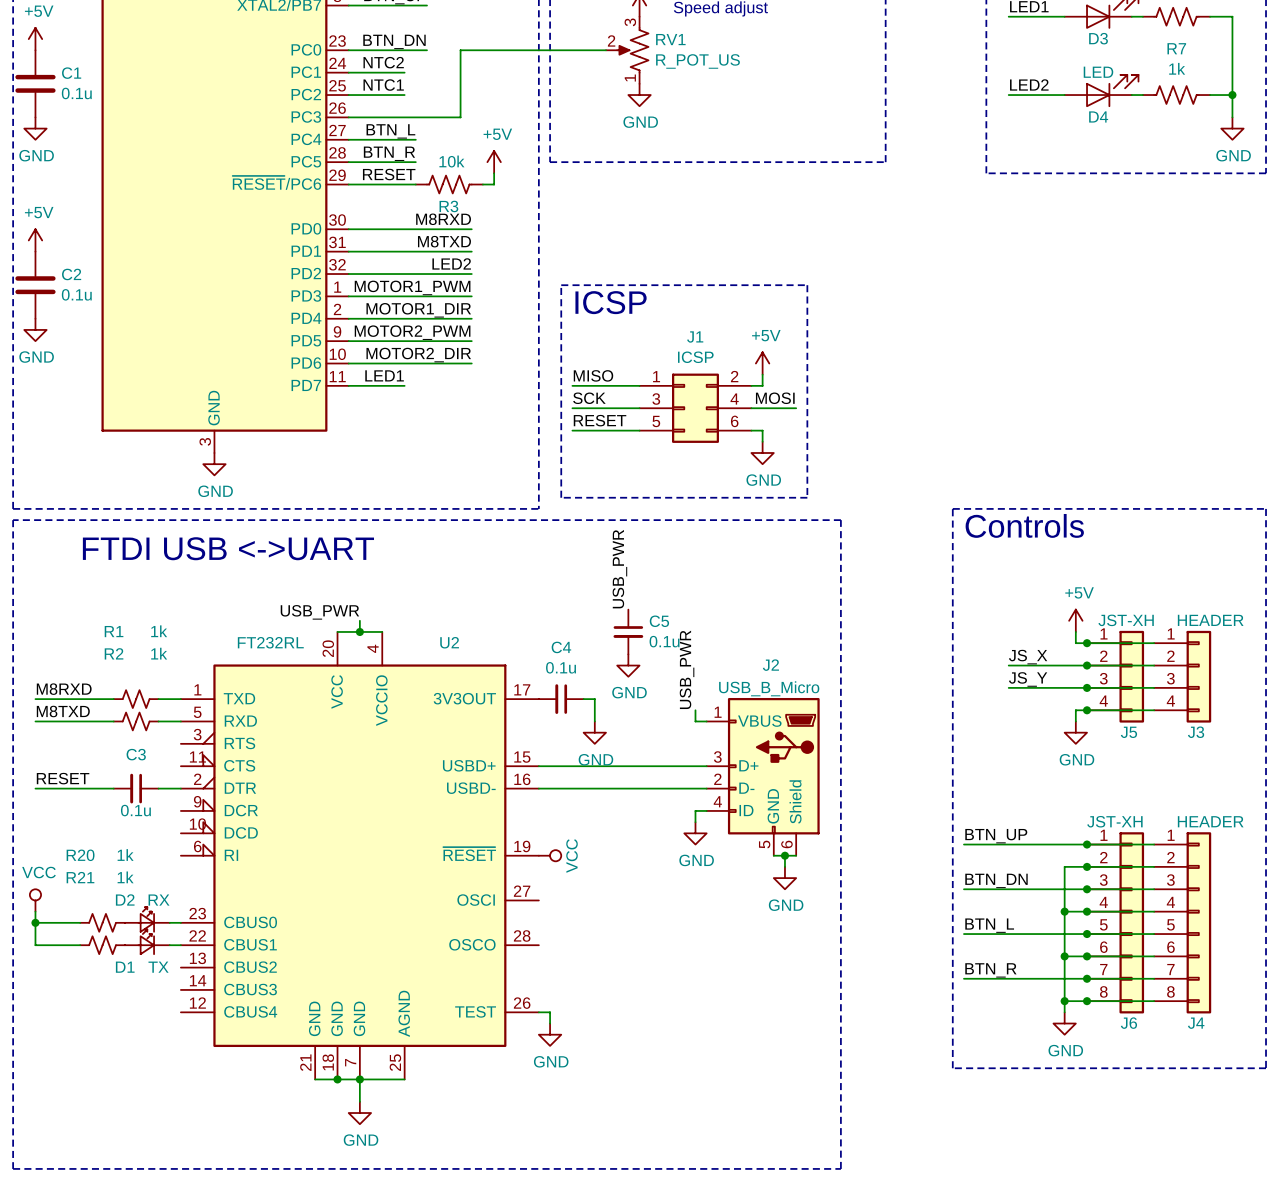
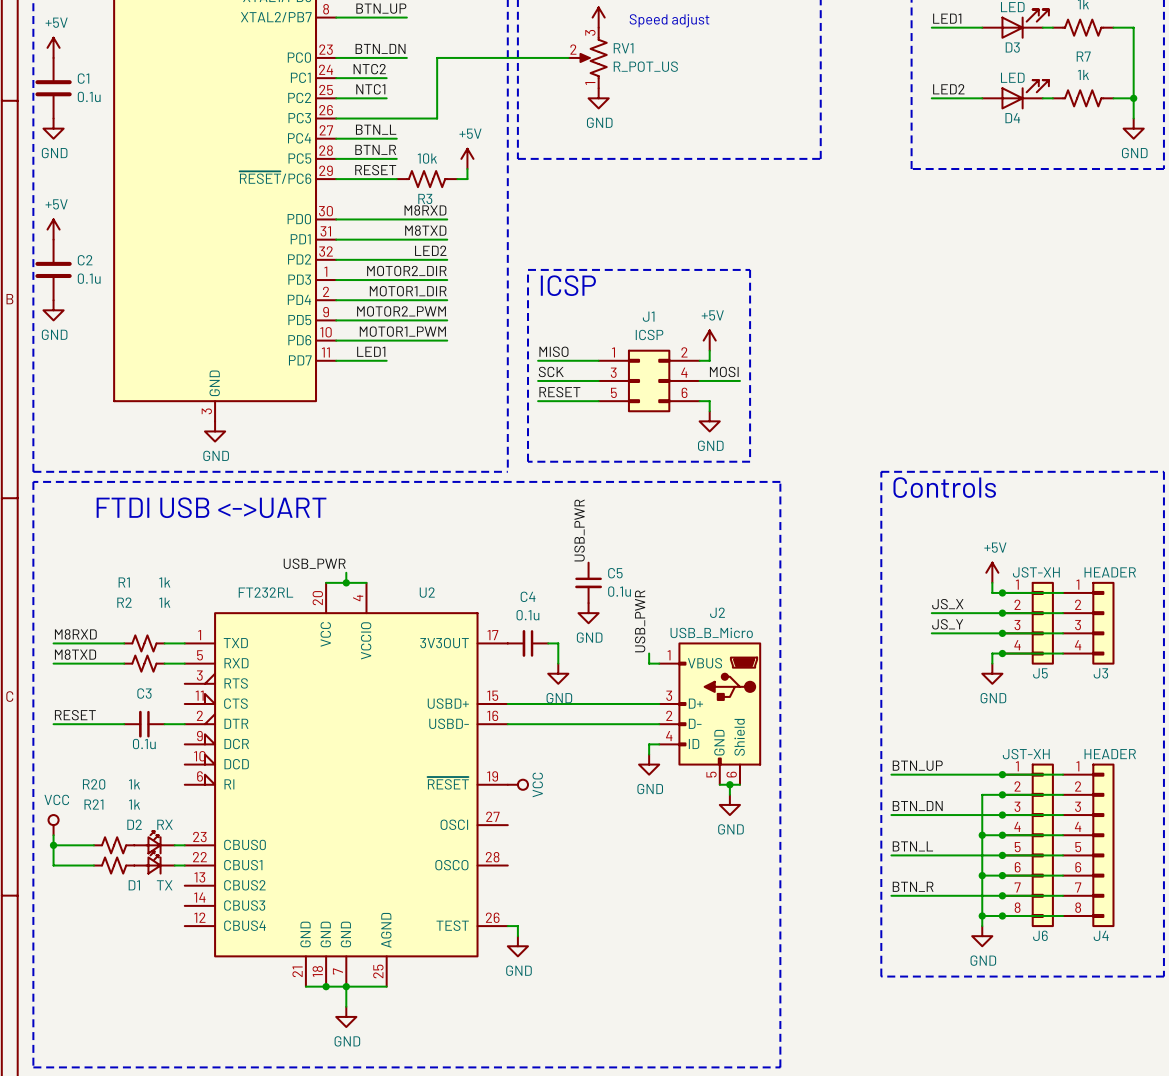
label: MOTOR1_PWM (412, 287) -> MOTOR2_DIR (406, 271)
label: MOTOR2_DIR (418, 355) -> MOTOR1_PWM (402, 331)

